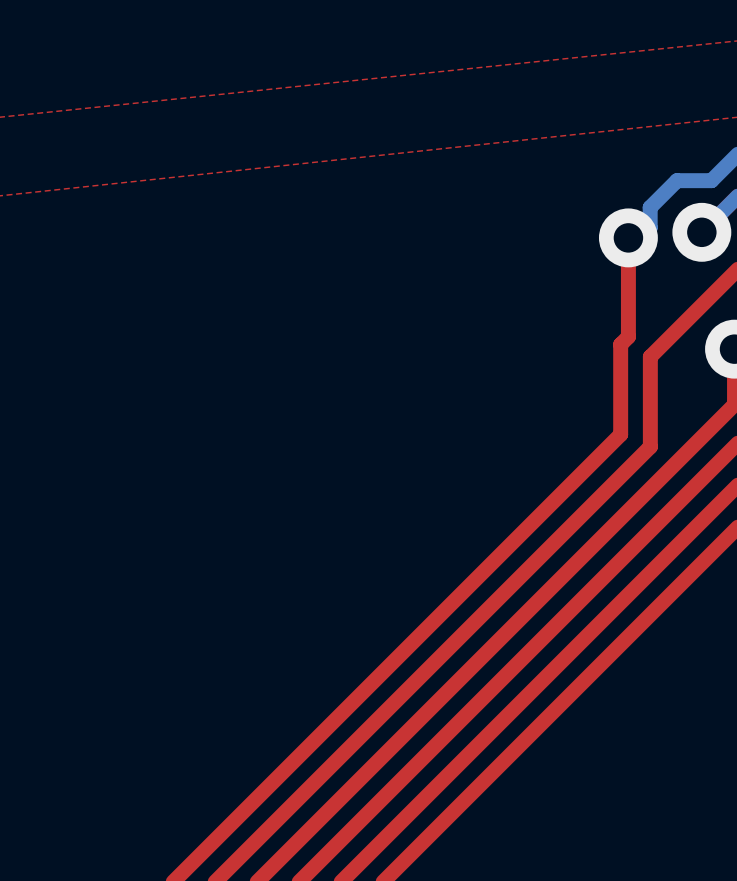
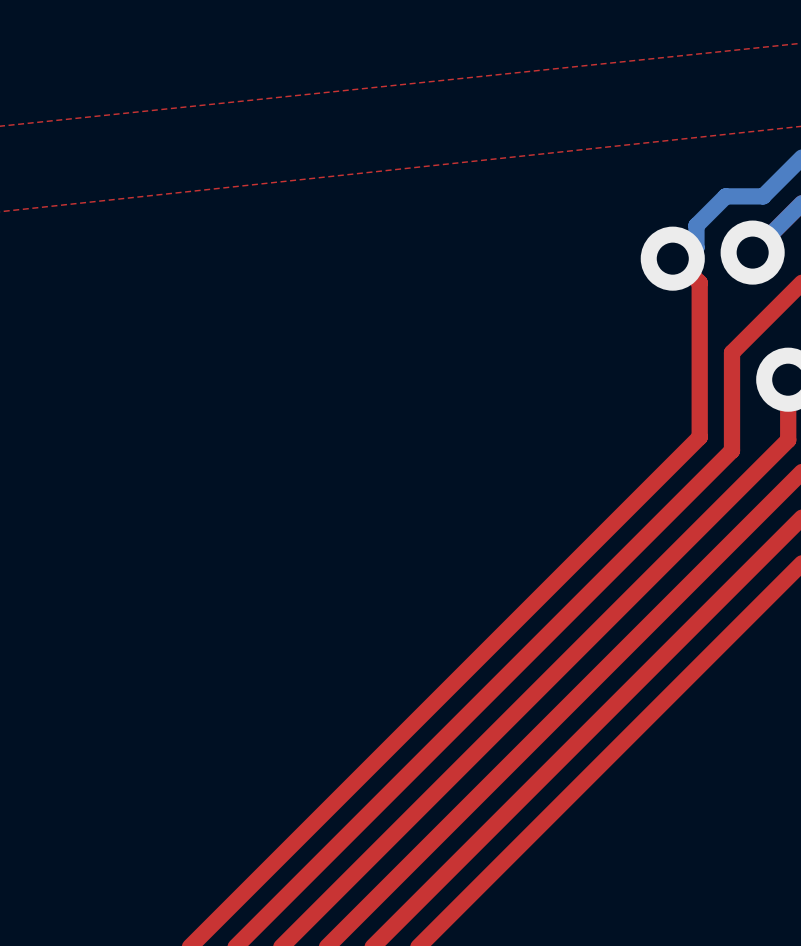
top track: (628, 237) (628, 336) (620, 344) (620, 434) -> (672, 258) (675, 258) (699, 282) (699, 437) (664, 472)
top track: (682, 324) (650, 356) (650, 446) -> (732, 352) (732, 450) (696, 485)

